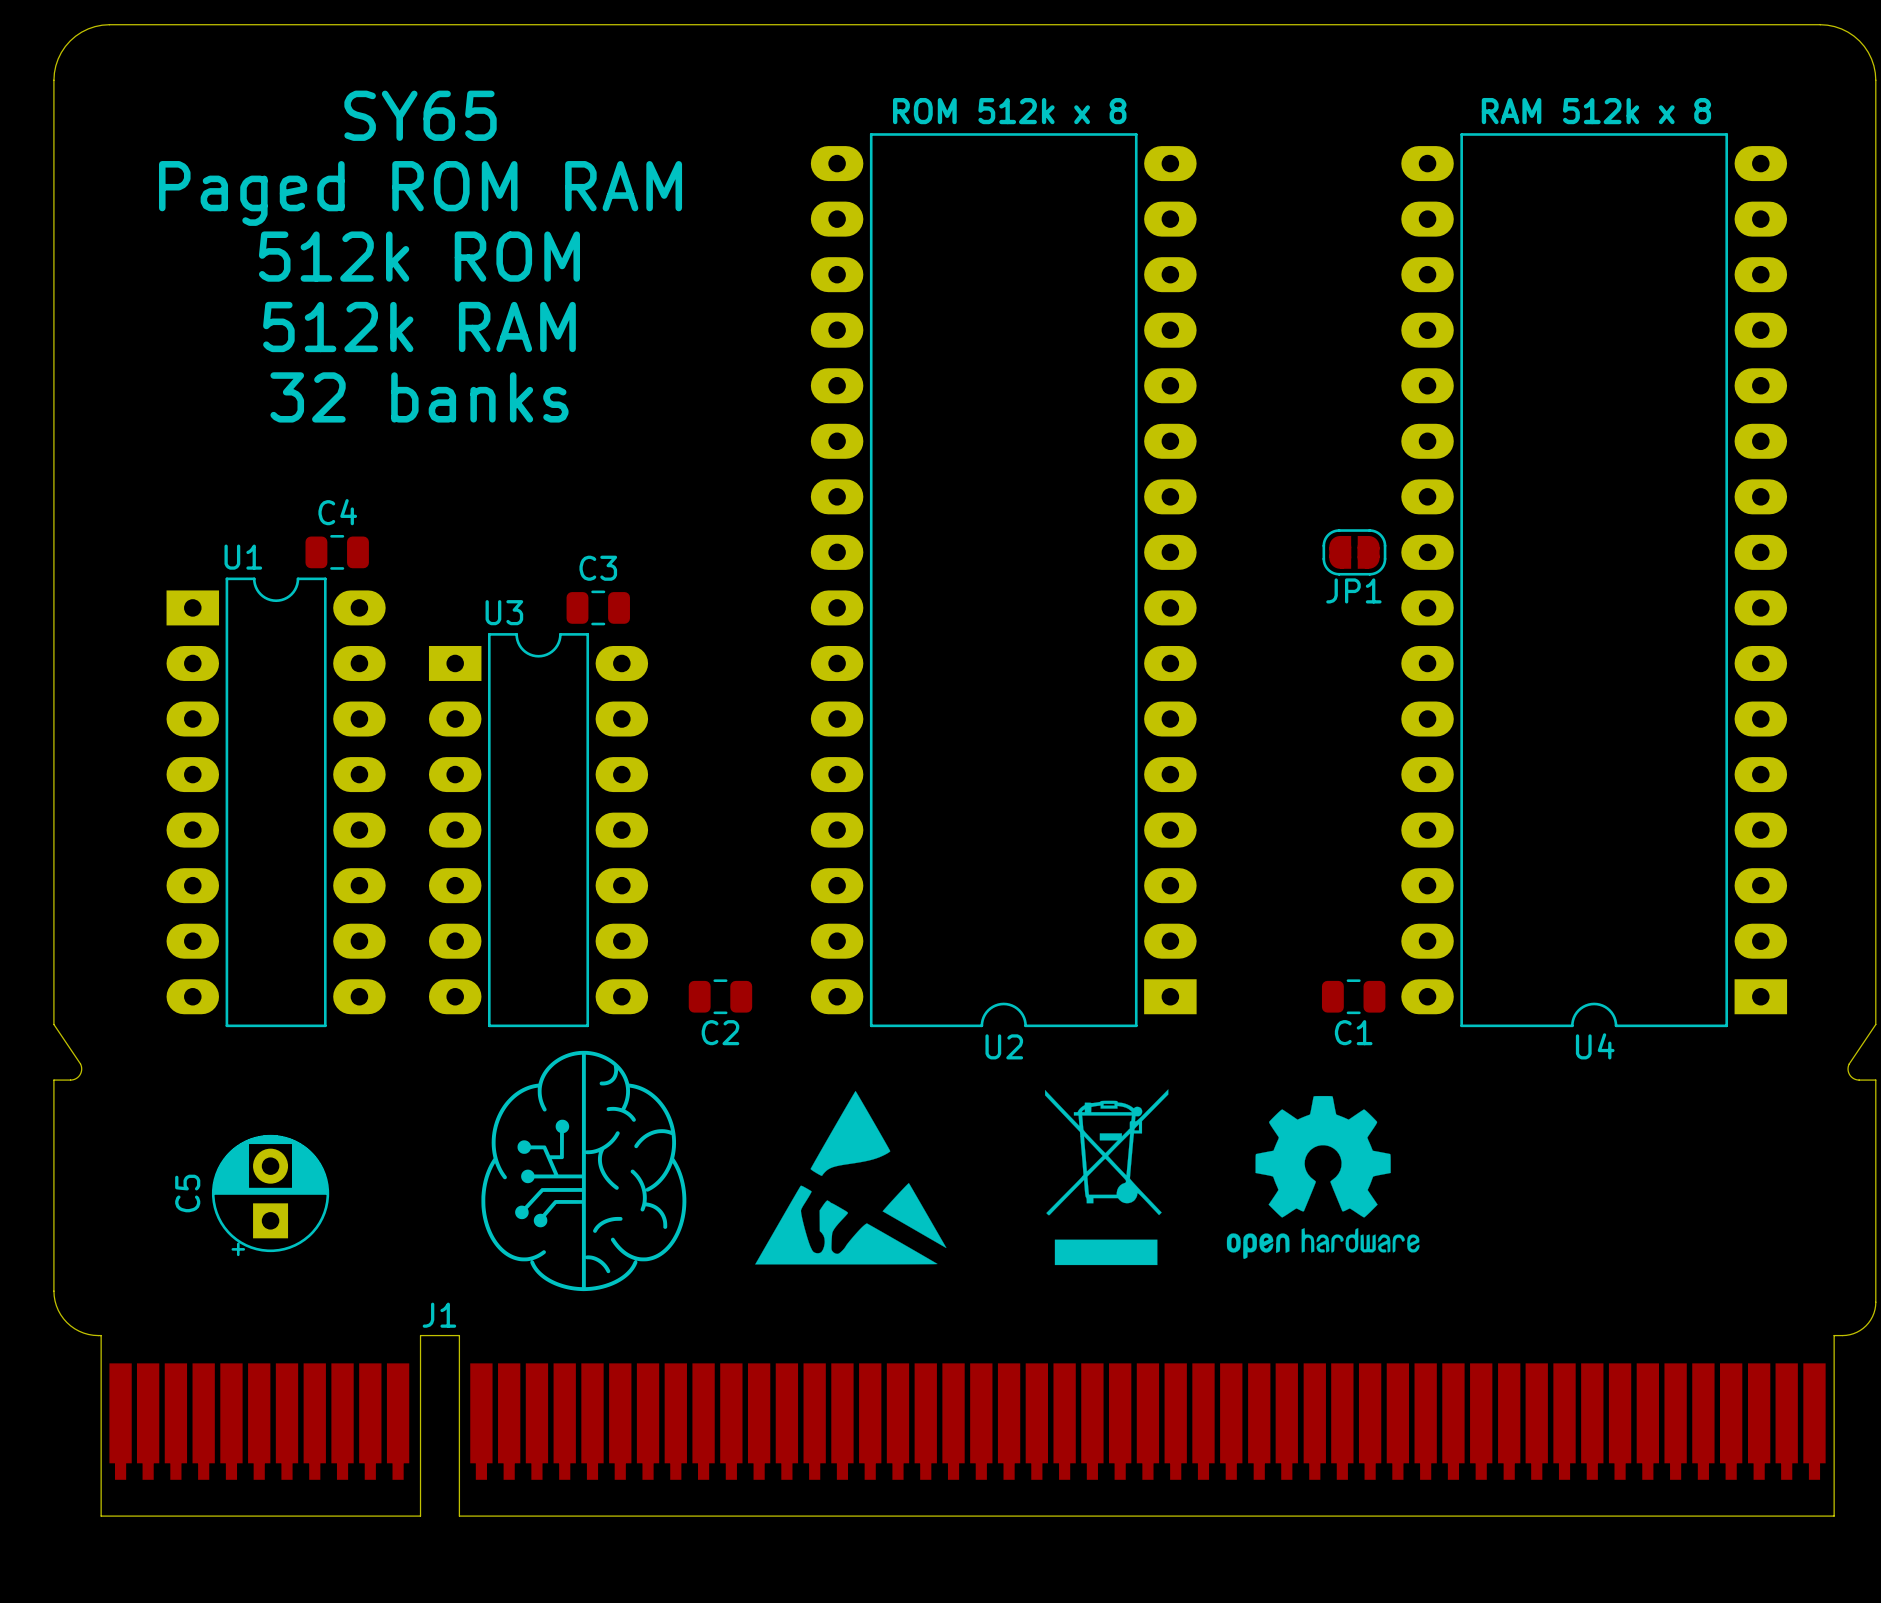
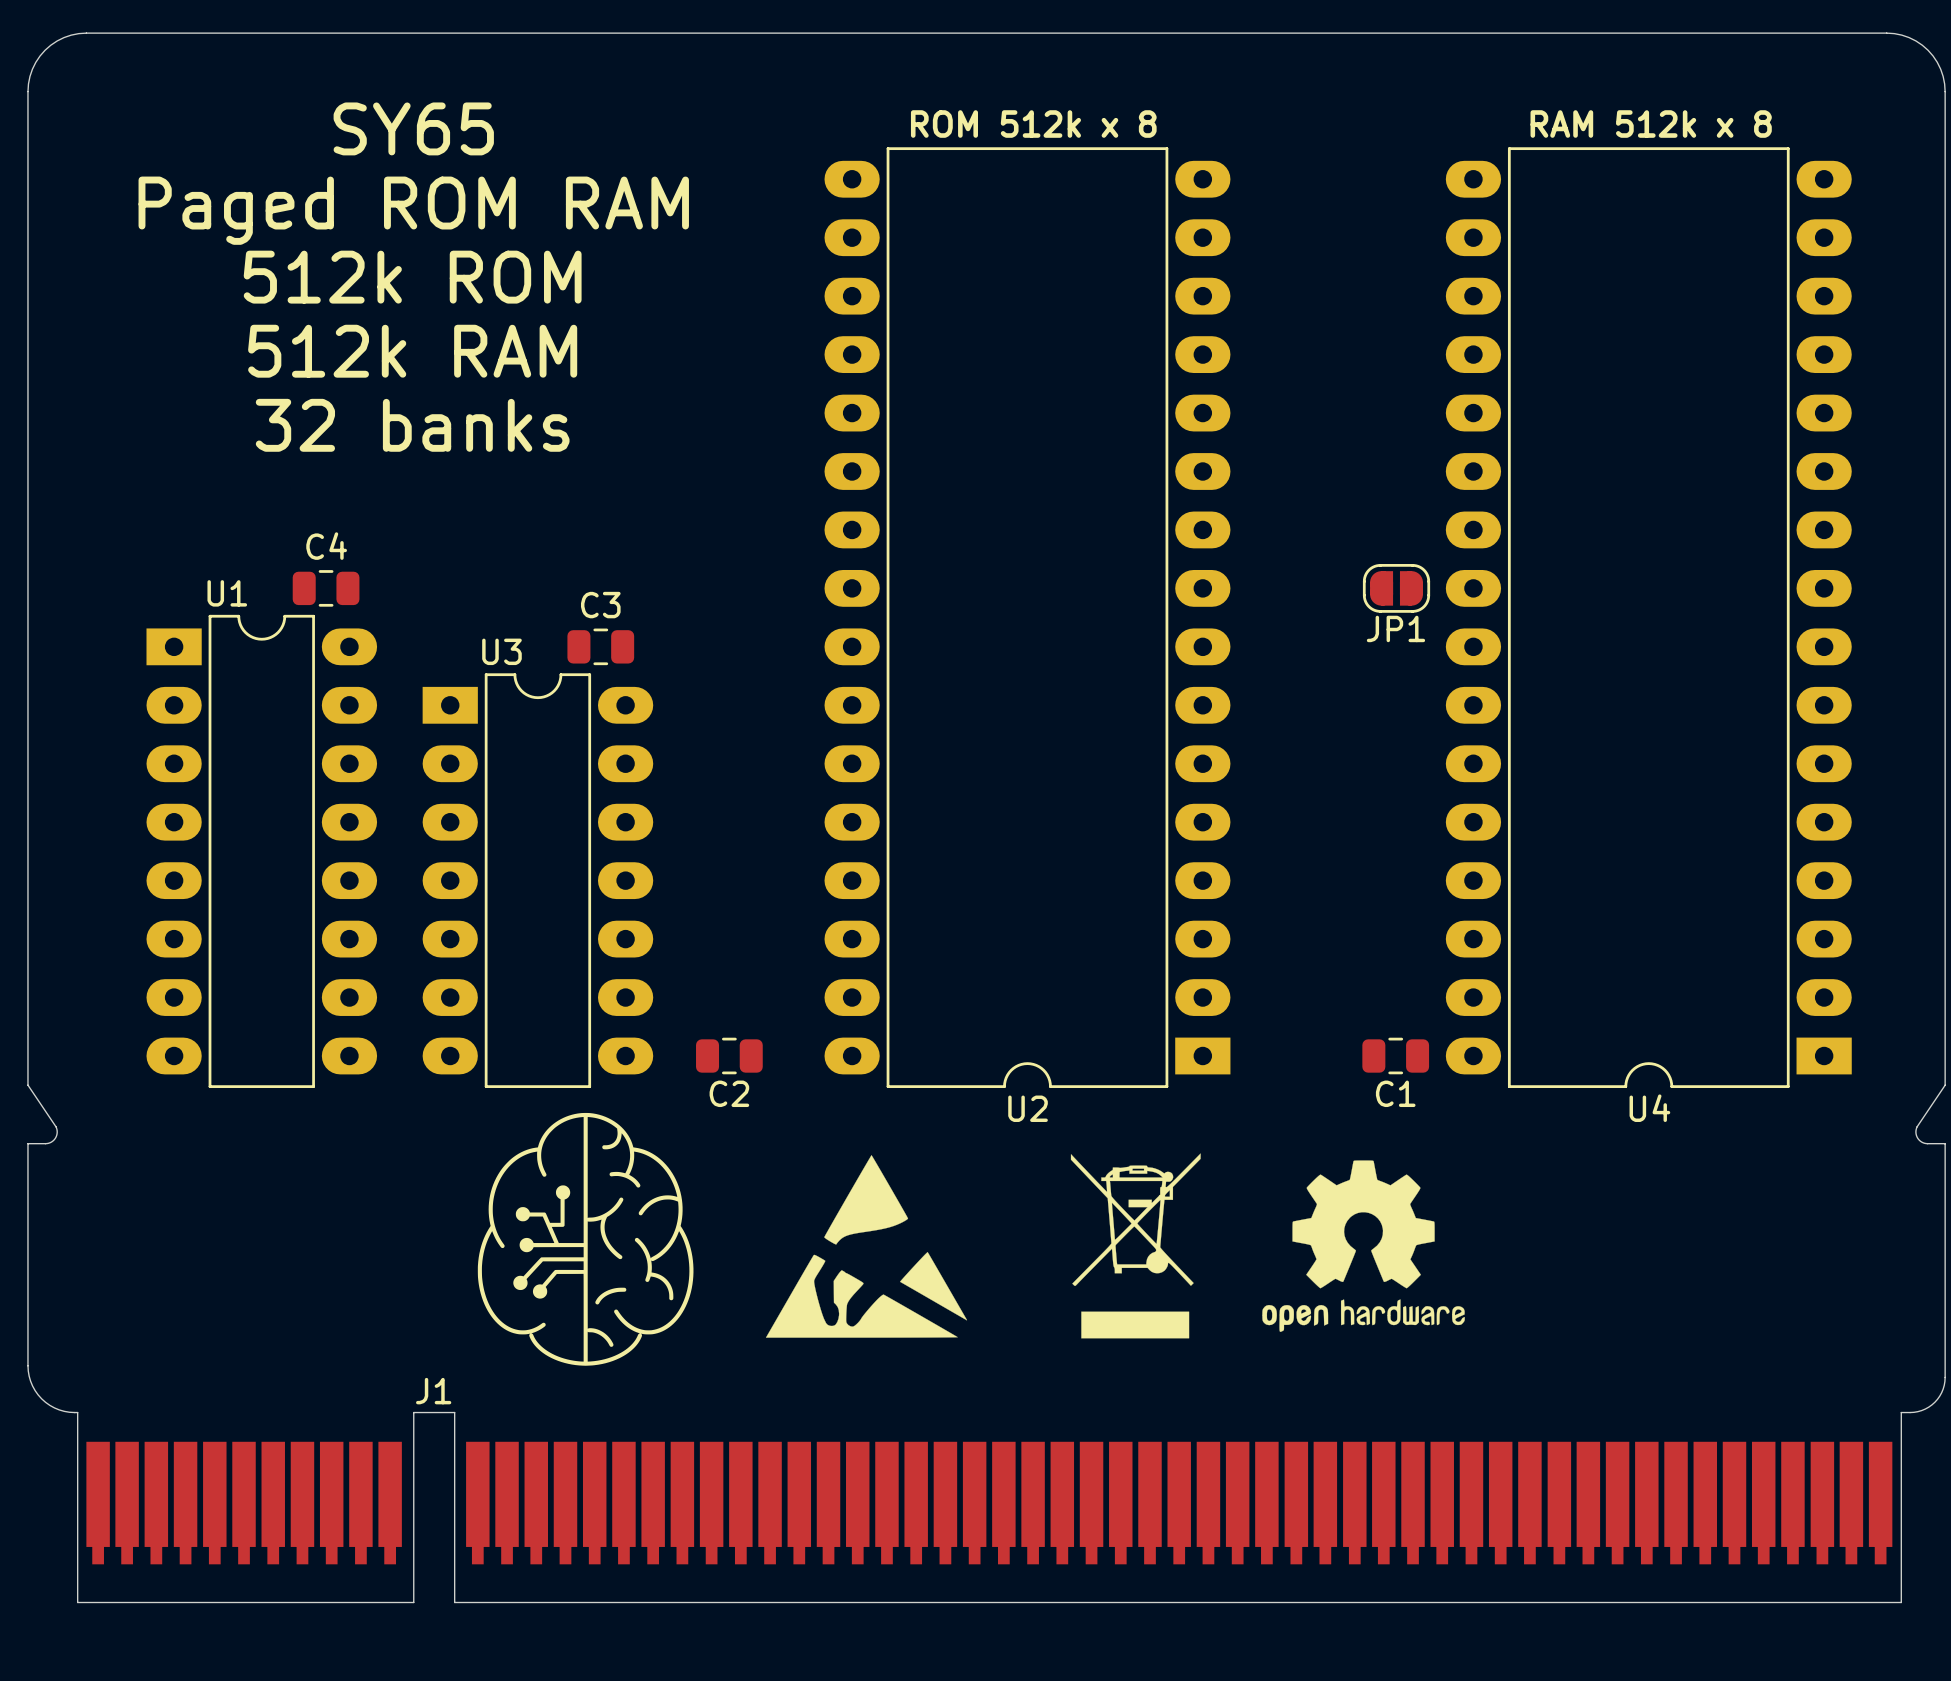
C5: (270, 1195) -> none

